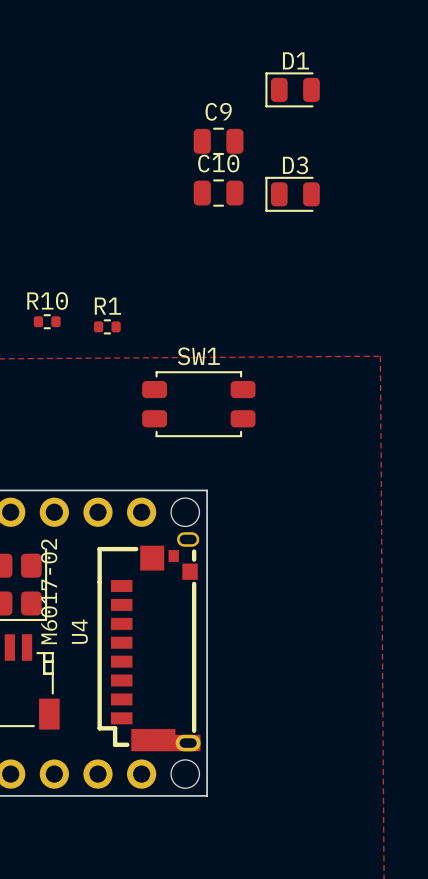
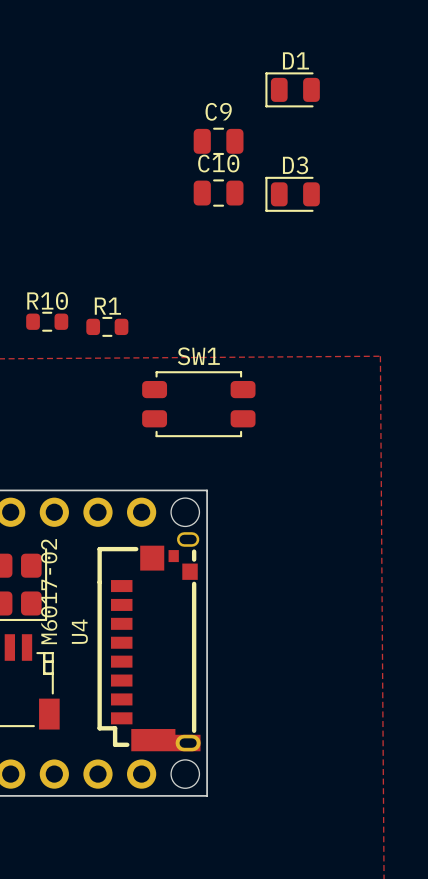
R10 footprint: [33, 314, 61, 330] -> [26, 311, 69, 332]
R1 footprint: [93, 319, 121, 335] -> [86, 316, 129, 337]

